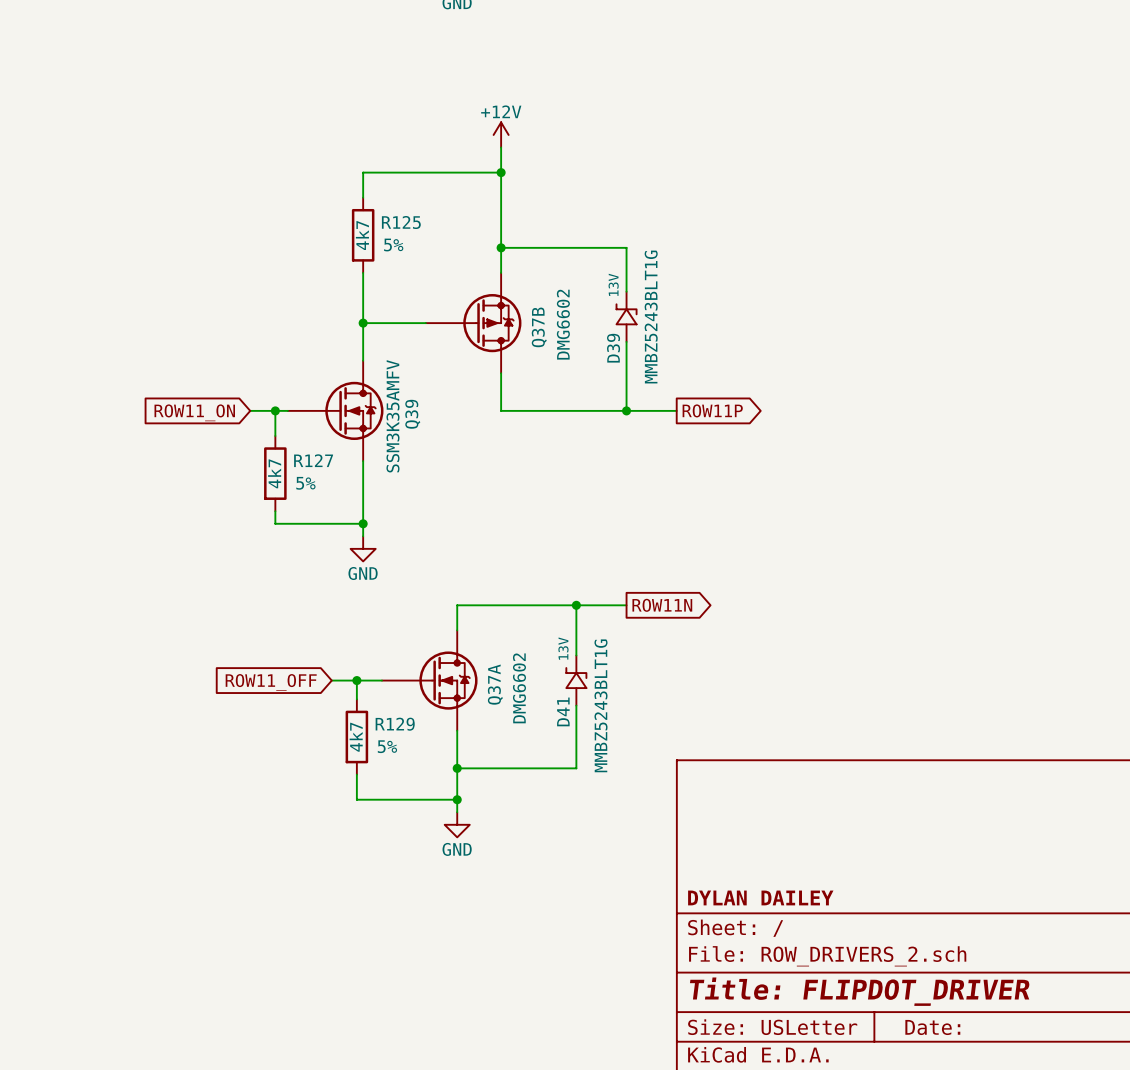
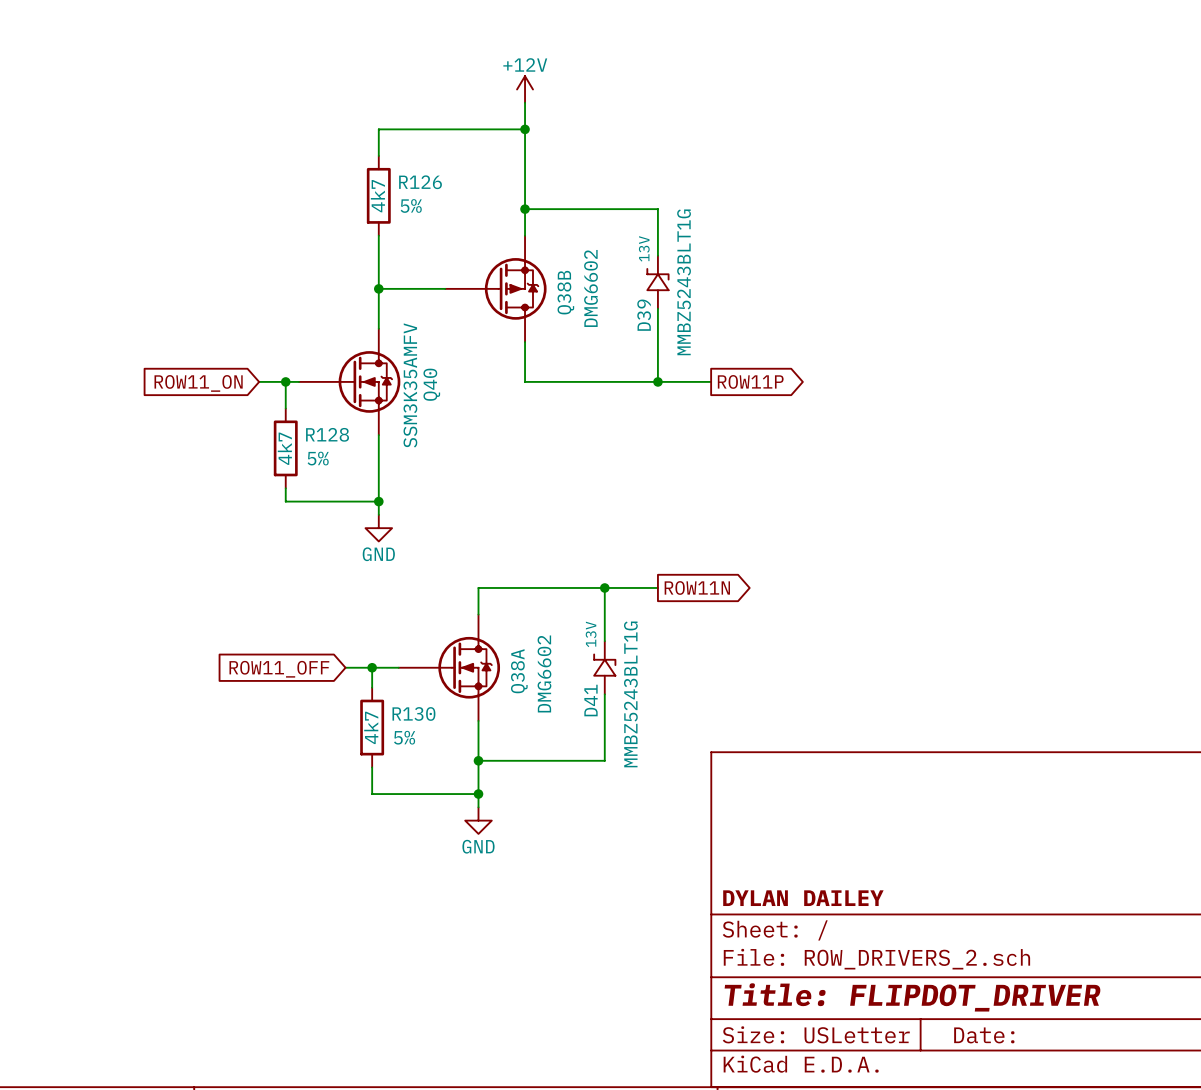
R125 name: R125 (401, 222) -> R126 (420, 182)
Q37B name: Q37B (539, 327) -> Q38B (565, 292)
Q39 name: Q39 (412, 414) -> Q40 (431, 384)
R127 name: R127 (313, 460) -> R128 (327, 434)
Q37A name: Q37A (495, 684) -> Q38A (519, 671)
R129 name: R129 (395, 724) -> R130 (413, 713)

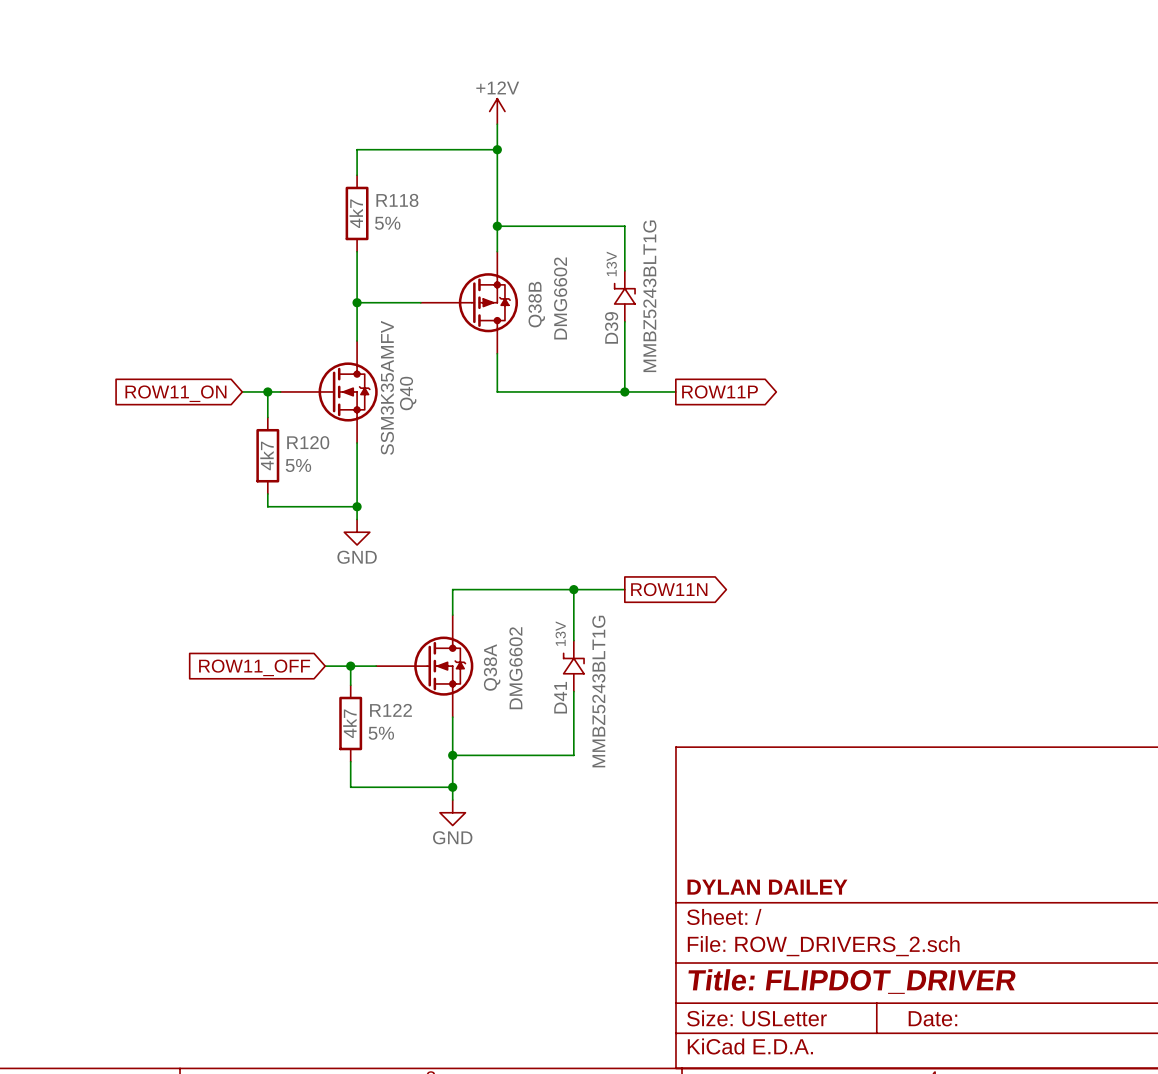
R126 name: R126 (420, 182) -> R118 (397, 200)
R128 name: R128 (327, 434) -> R120 (308, 442)
R130 name: R130 (413, 713) -> R122 (390, 710)

